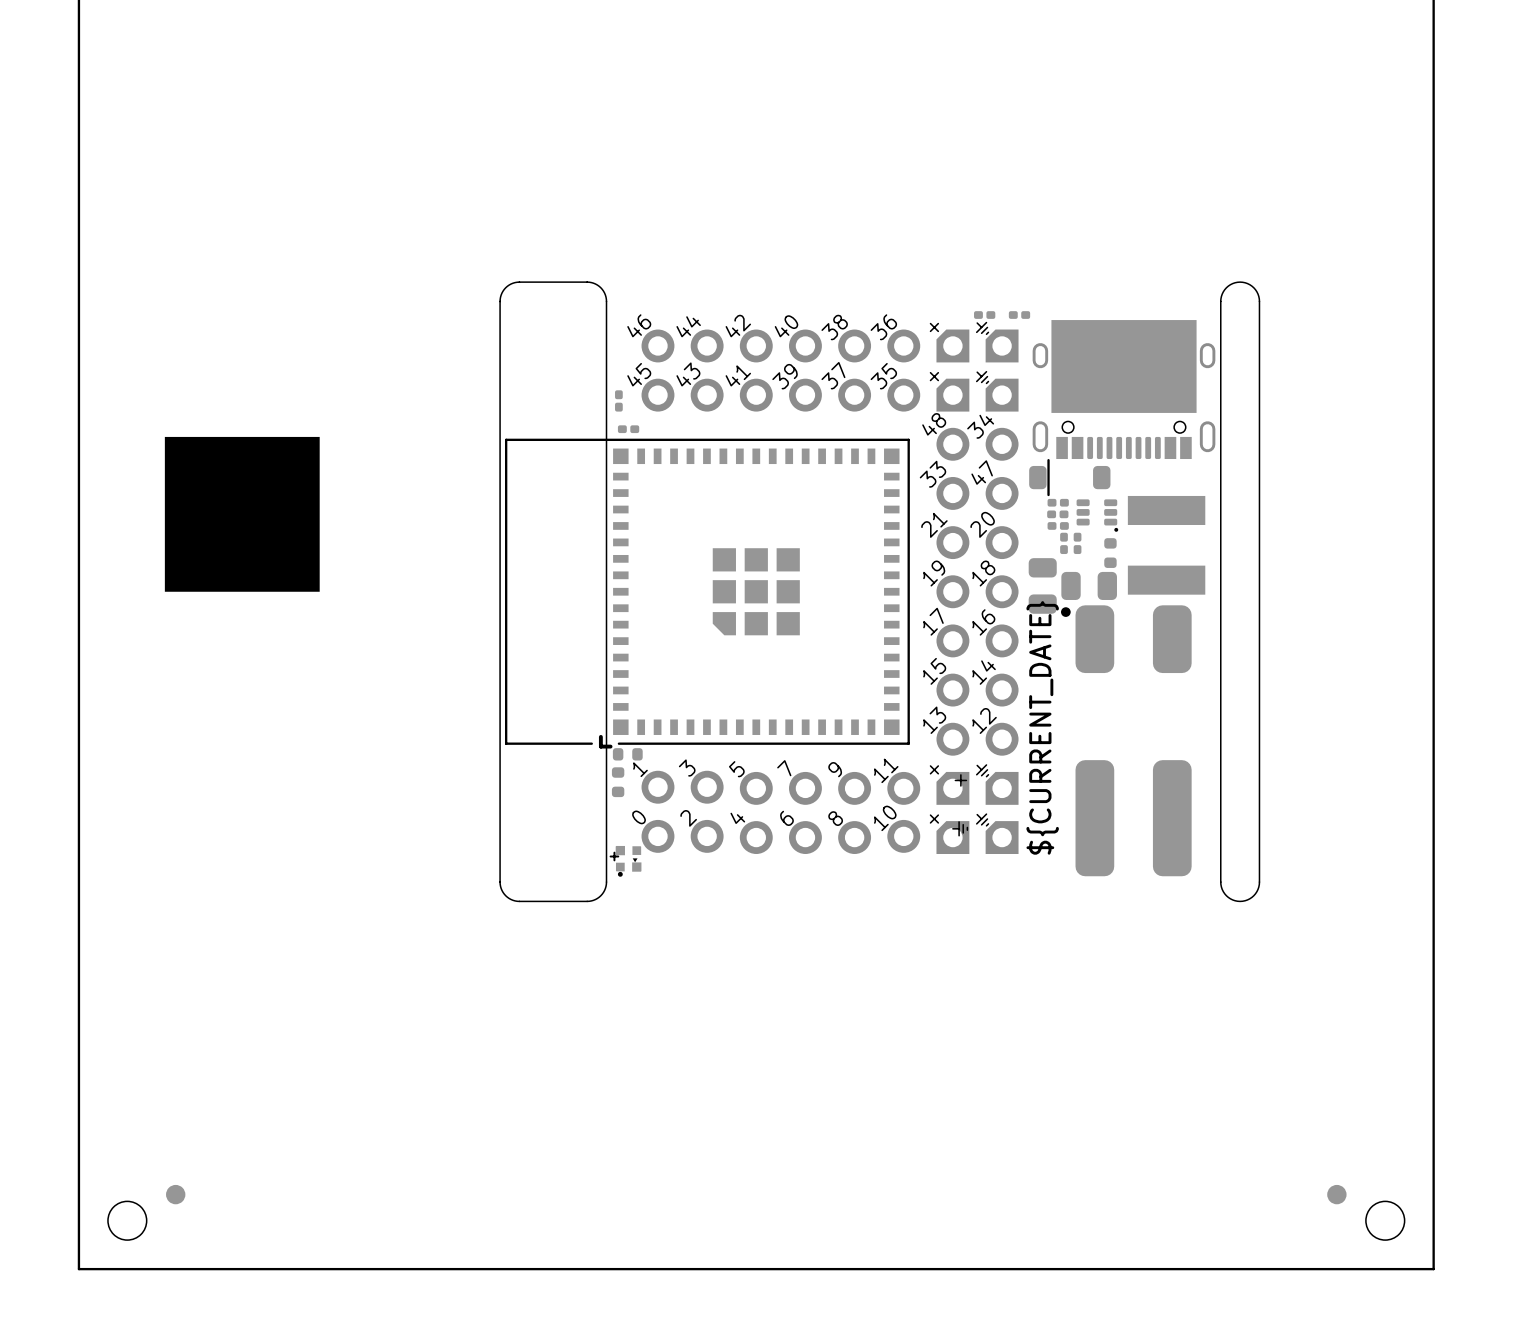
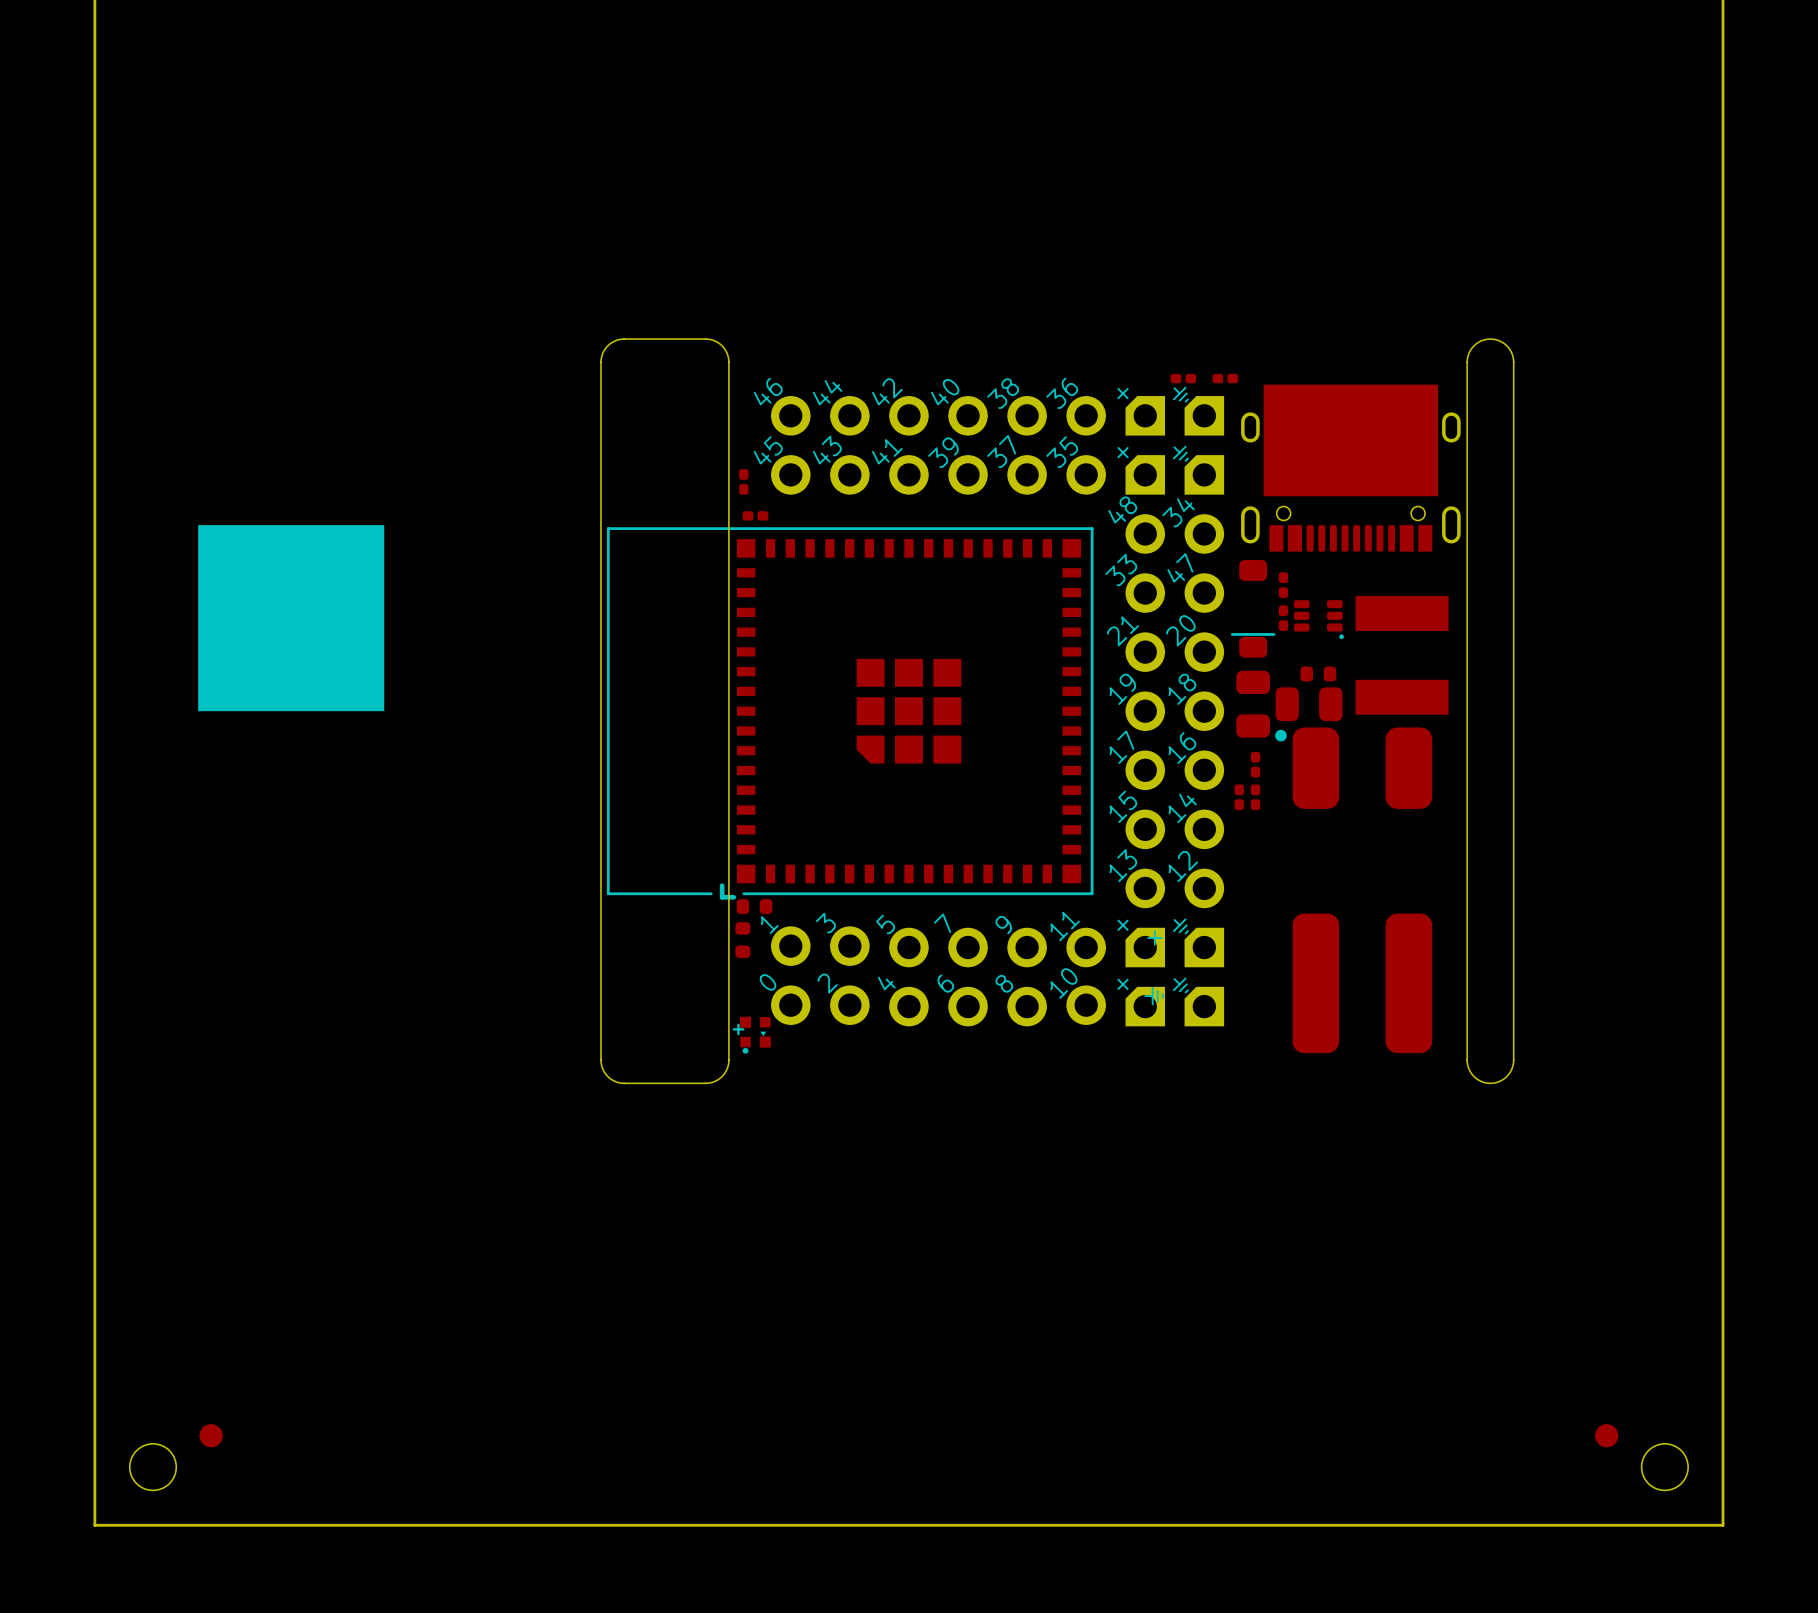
part rotation: 0° (1069, 477) -> 90° counterclockwise (1253, 608)
part: none -> (1283, 585)
part: (1058, 502) -> none
part: (1057, 514) -> none
part: none -> (1283, 618)
part: (1058, 525) -> none
part: (1064, 543) -> none
part: (1077, 543) -> none
part rotation: 0° (1110, 553) -> 90° clockwise (1318, 673)
part: none -> (1255, 764)
part: none -> (1239, 797)
part: none -> (1255, 797)
text: ${CURRENT_DATE} (1042, 727) -> none

